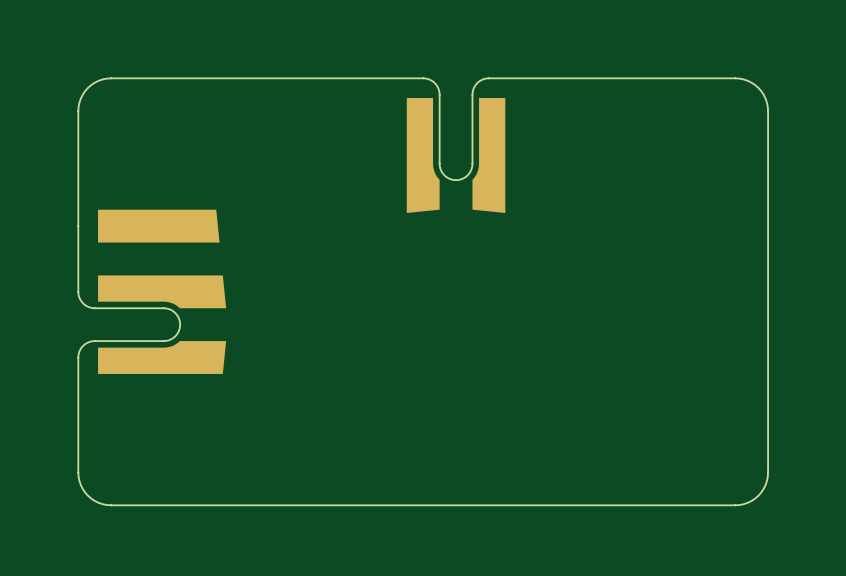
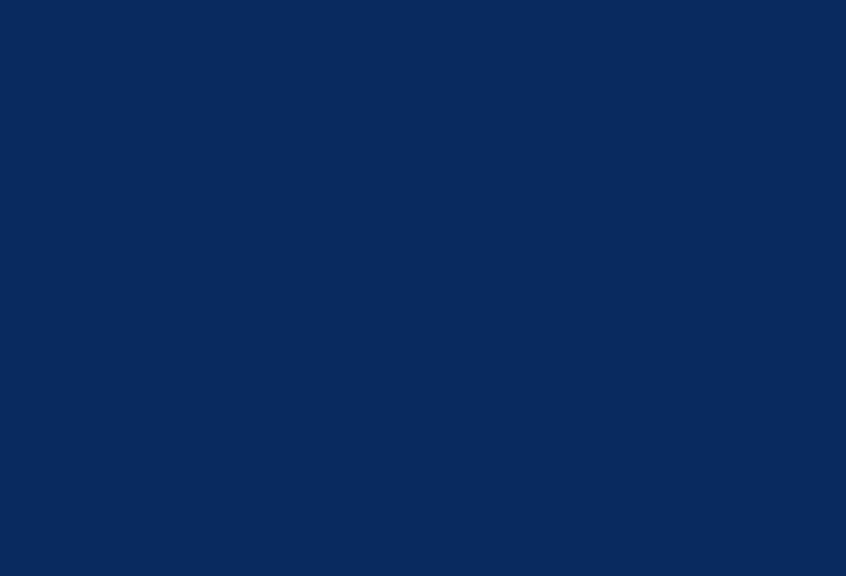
board edge: (423, 78) (111, 78) (98, 80) (85, 91) (78, 106) (78, 226) -> none
board edge: (488, 78) (735, 78) (751, 82) (763, 94) (768, 111) (768, 472) (765, 485) (755, 498) (747, 502) (735, 505) (102, 504) (91, 498) (85, 492) (78, 476) (78, 357) -> none
part: (456, 145) -> none
part: (151, 291) -> none

